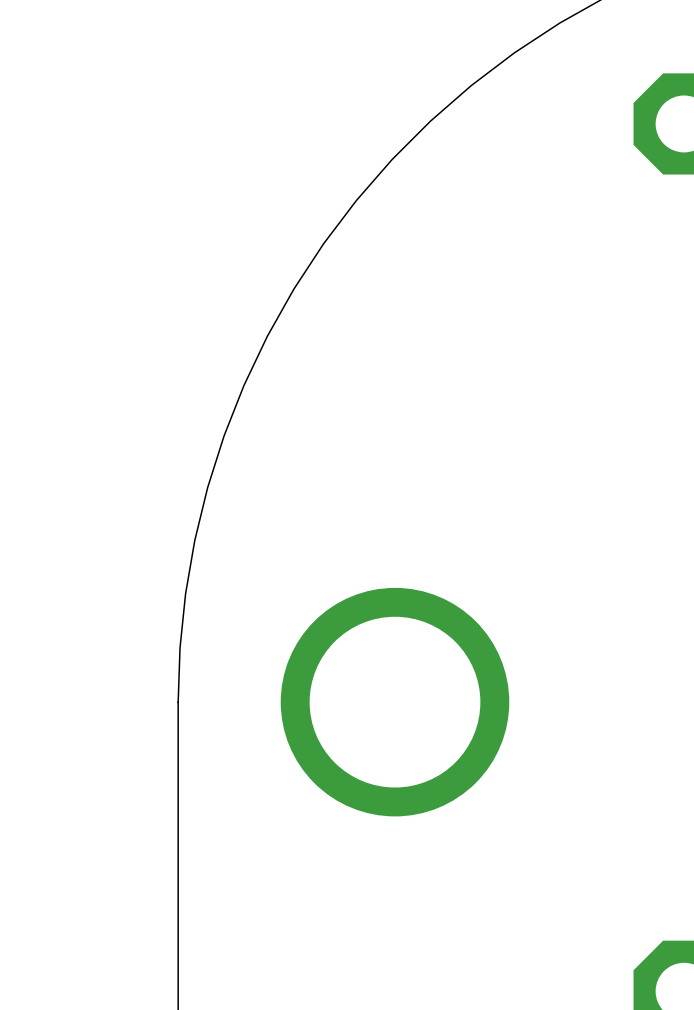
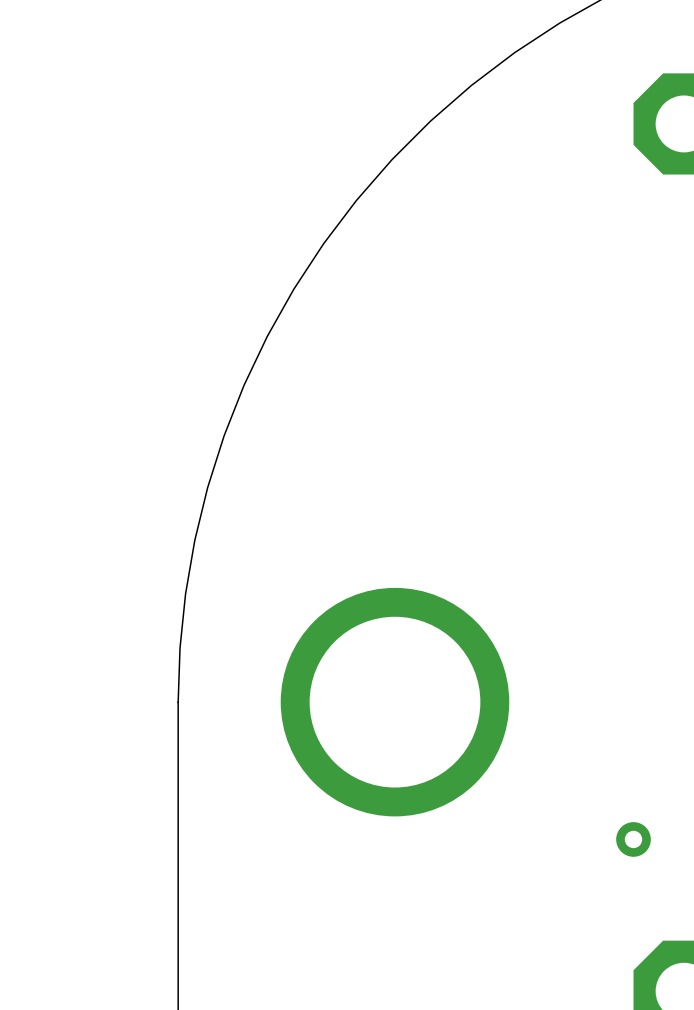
via: none -> (633, 839)

